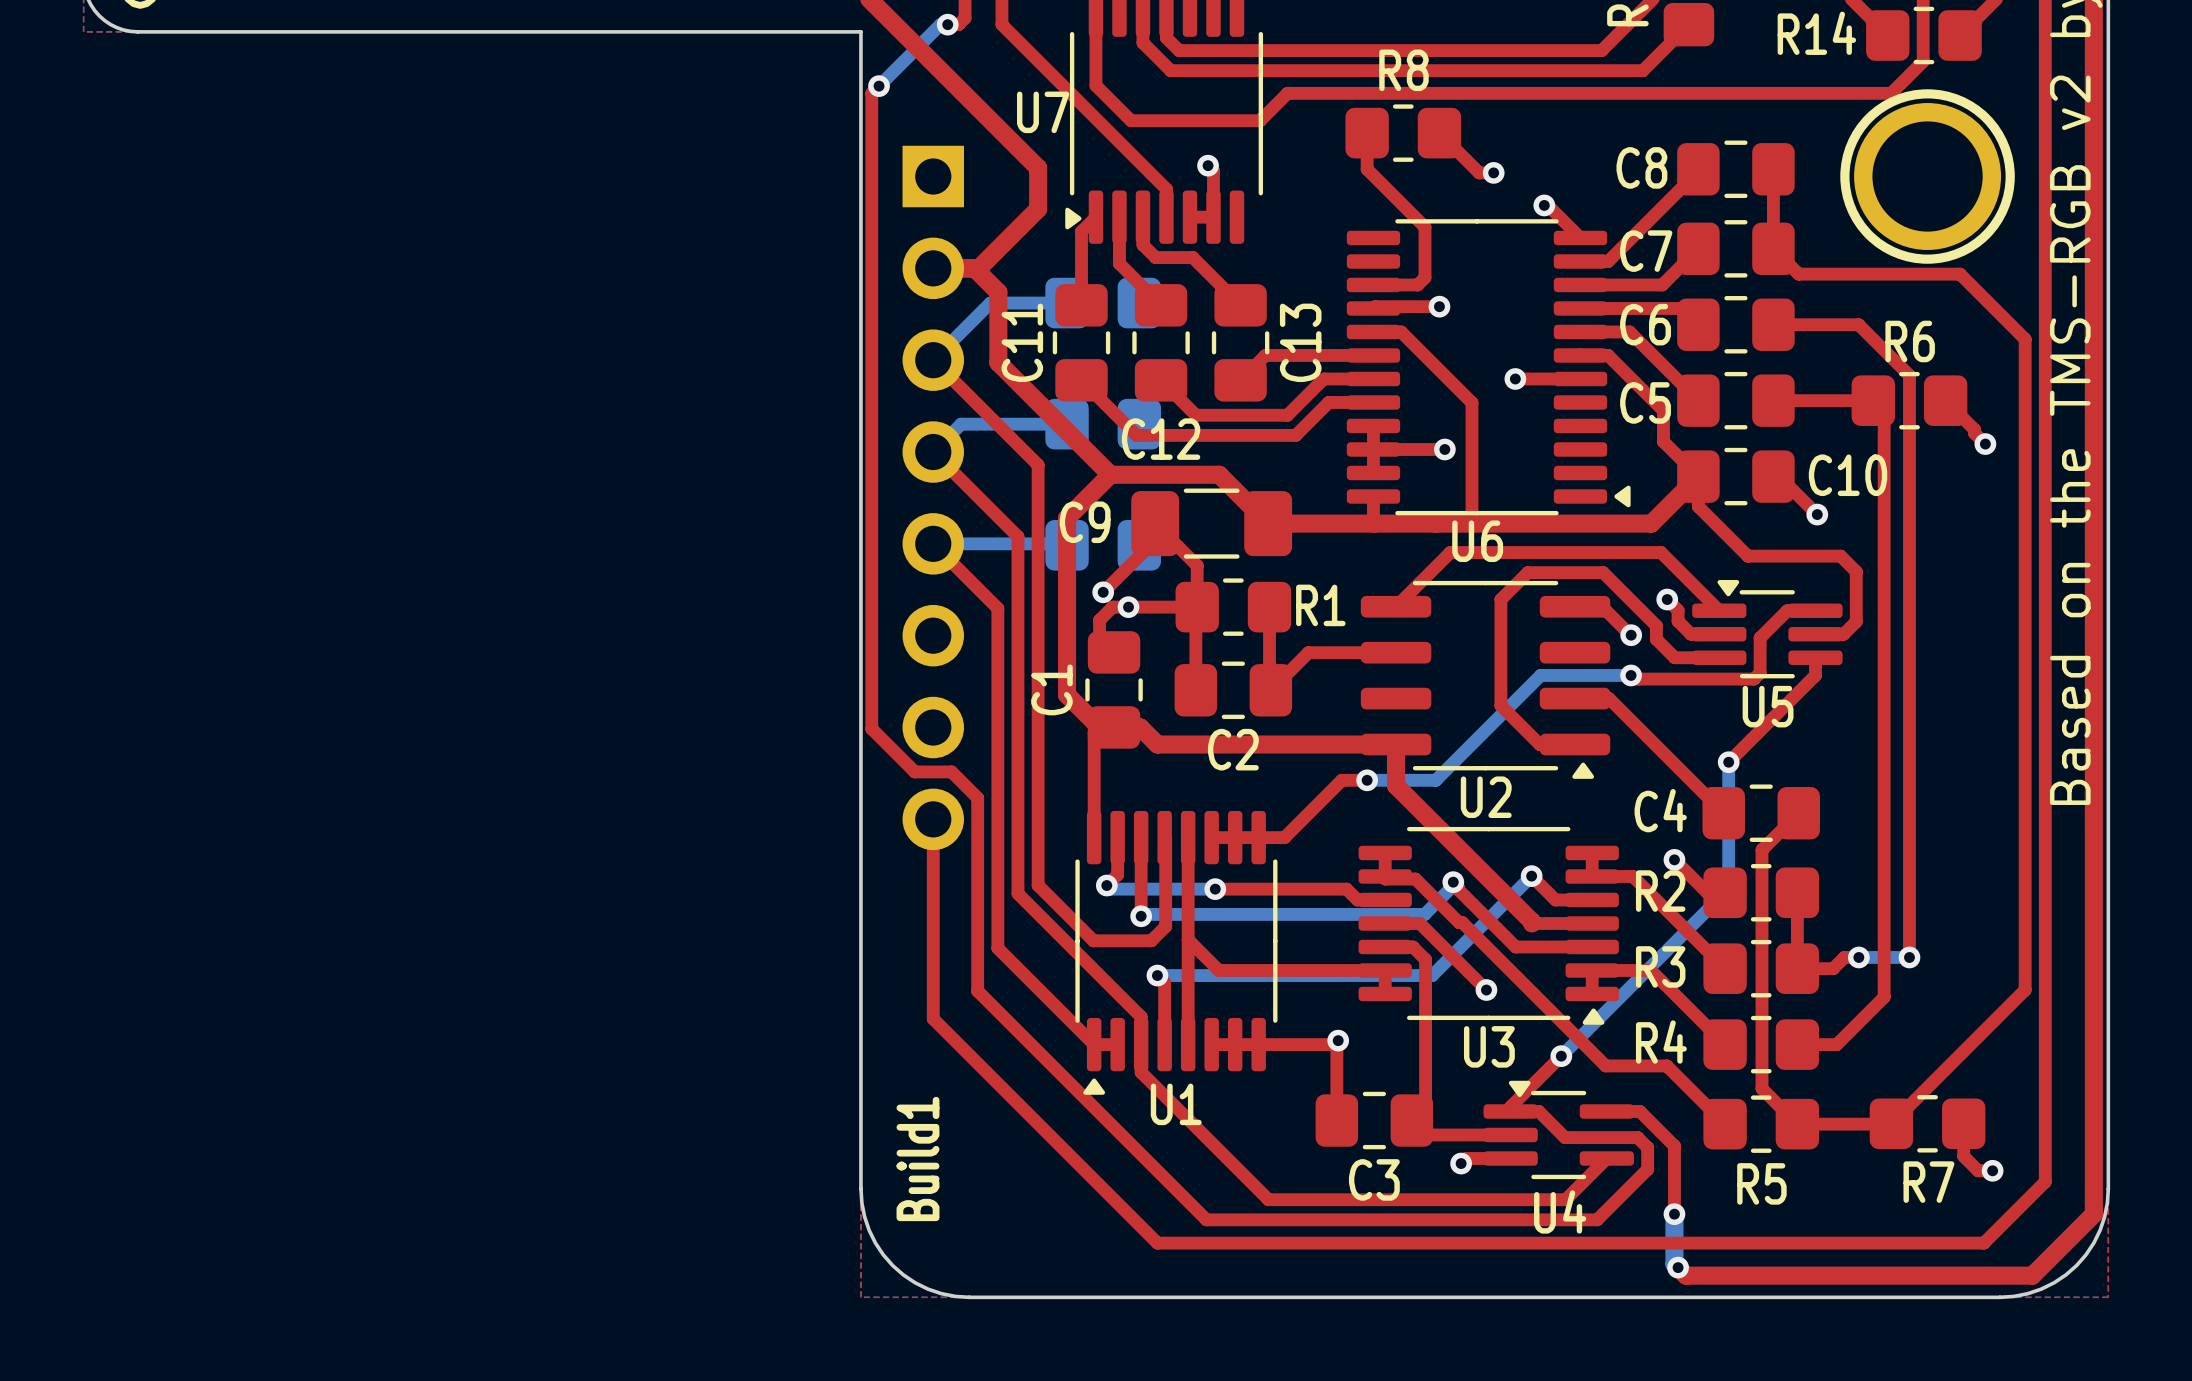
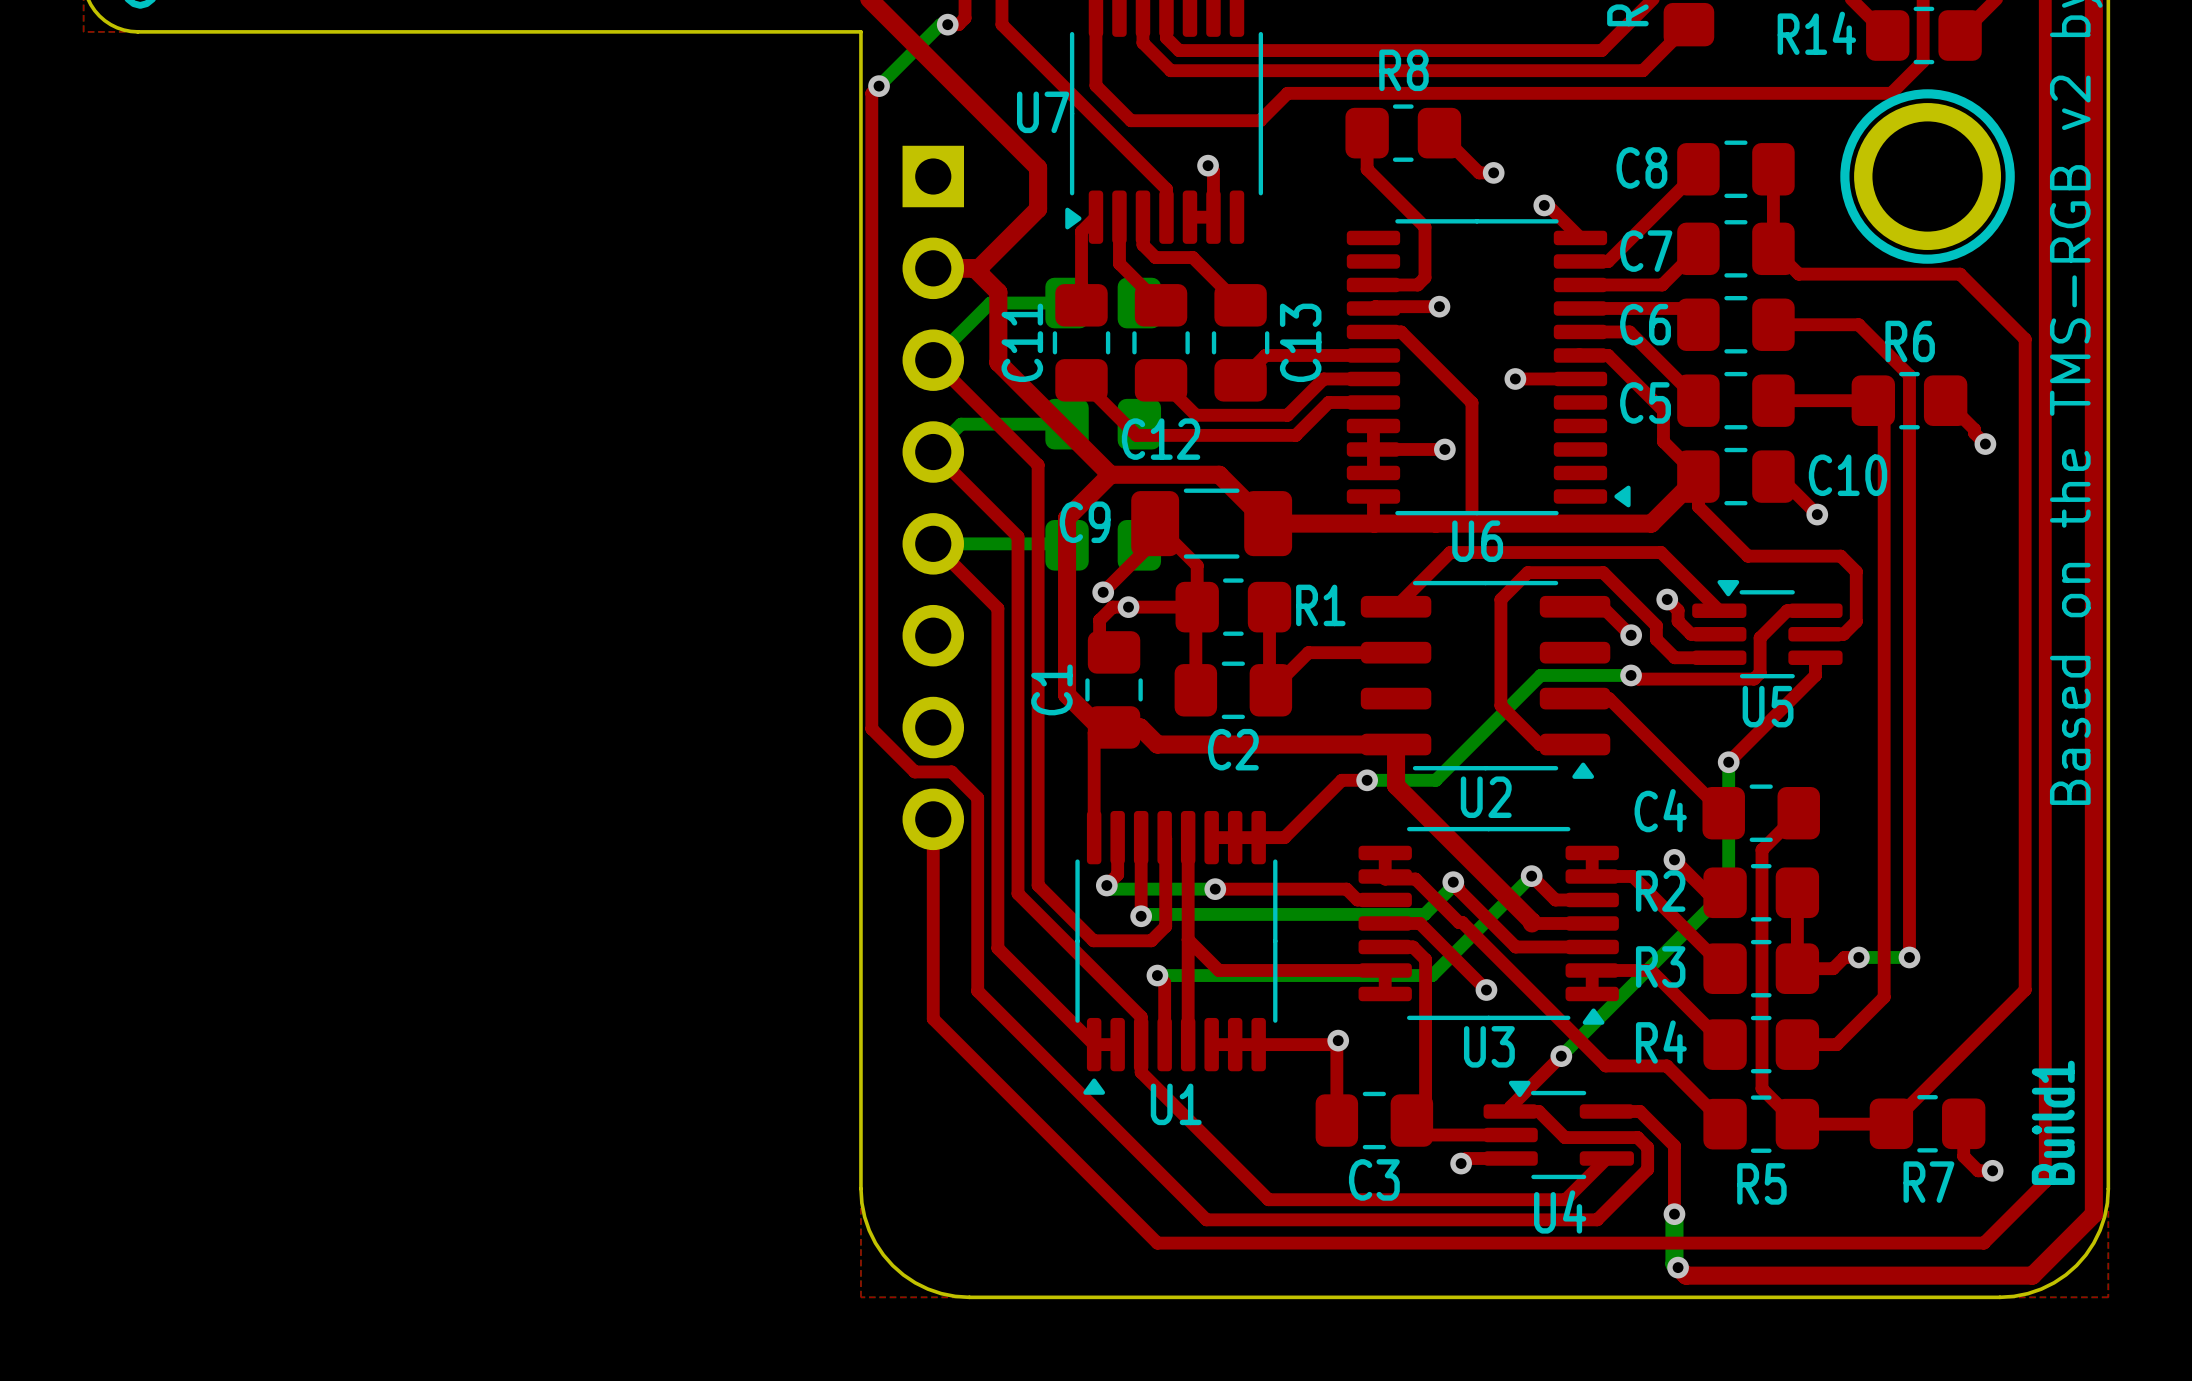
text: none -> Build1 (2053, 1122)
text: Build1 (917, 1158) -> none

